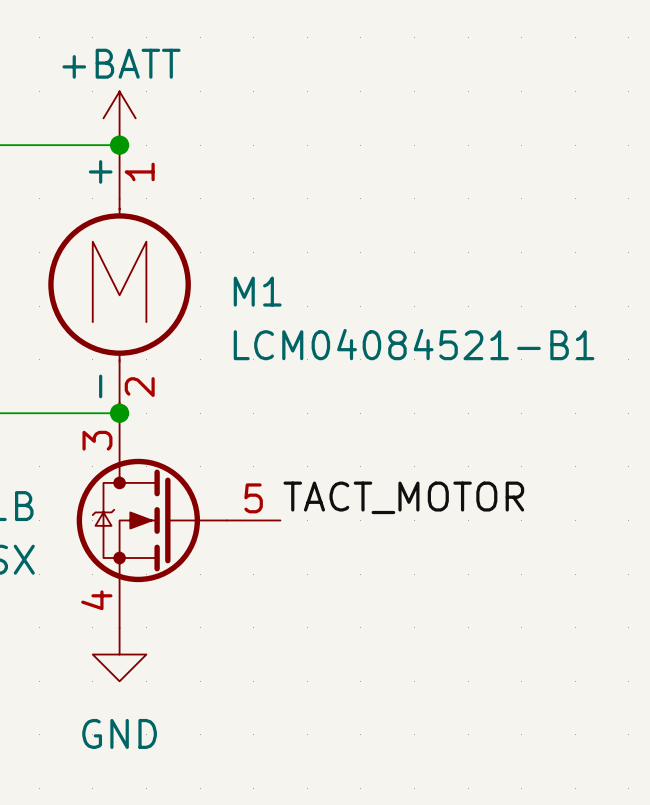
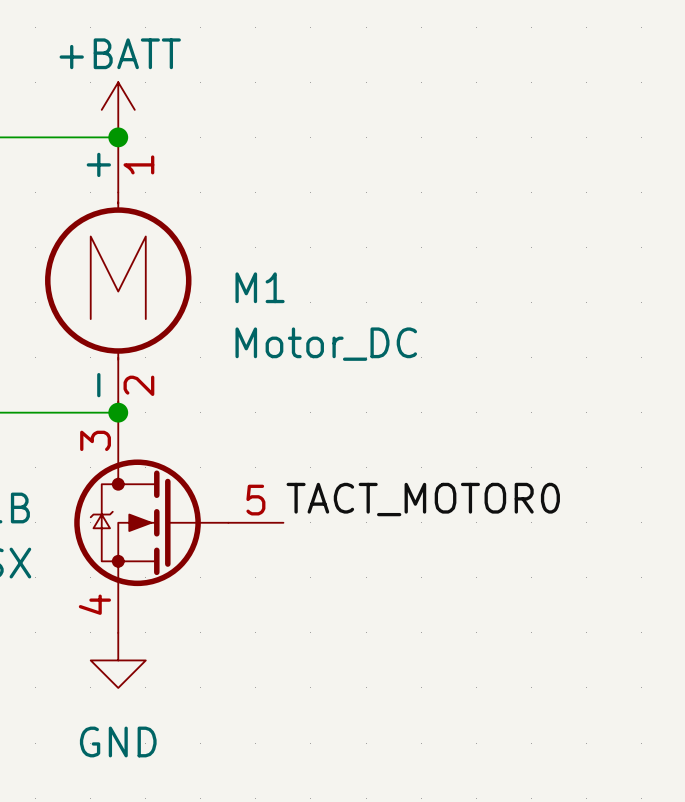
M1 value: LCM04084521-B1 (414, 344) -> Motor_DC (326, 344)
label: TACT_MOTOR (403, 497) -> TACT_MOTOR0 (423, 499)

